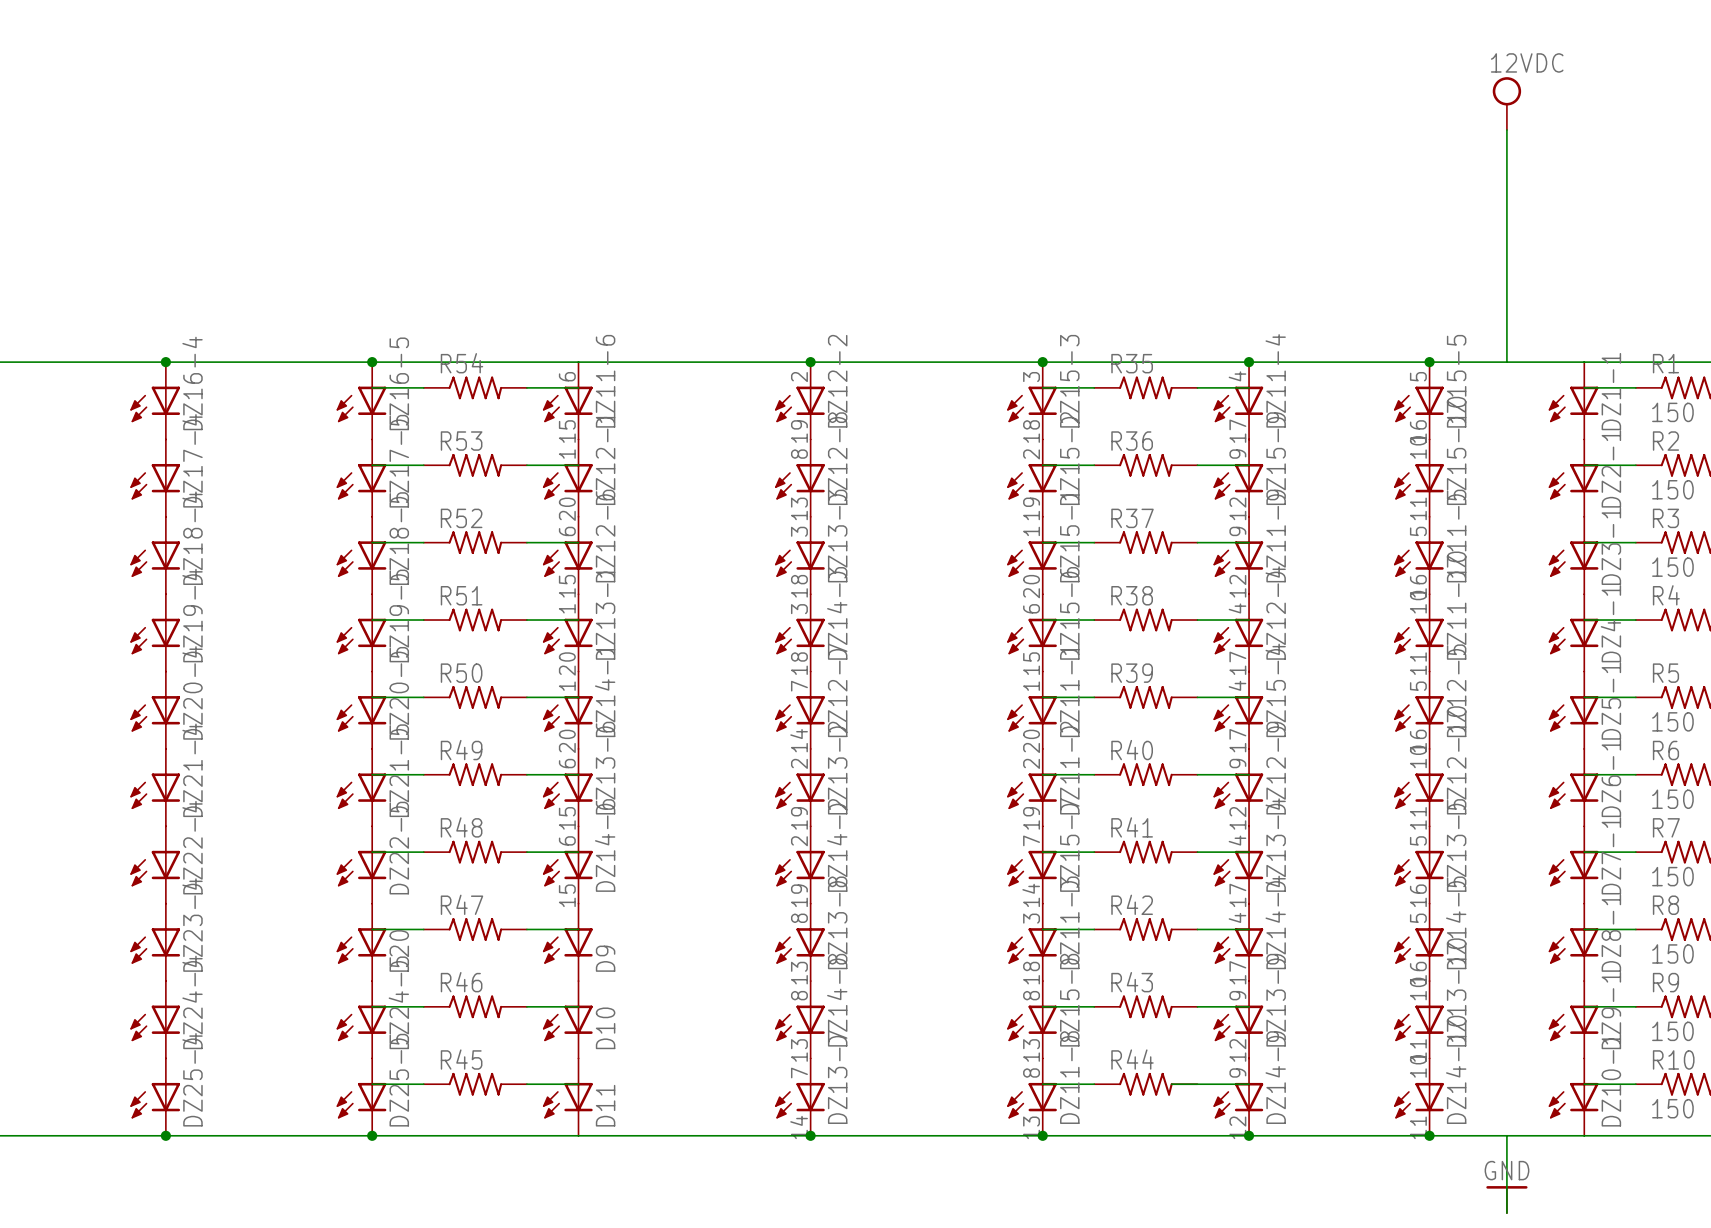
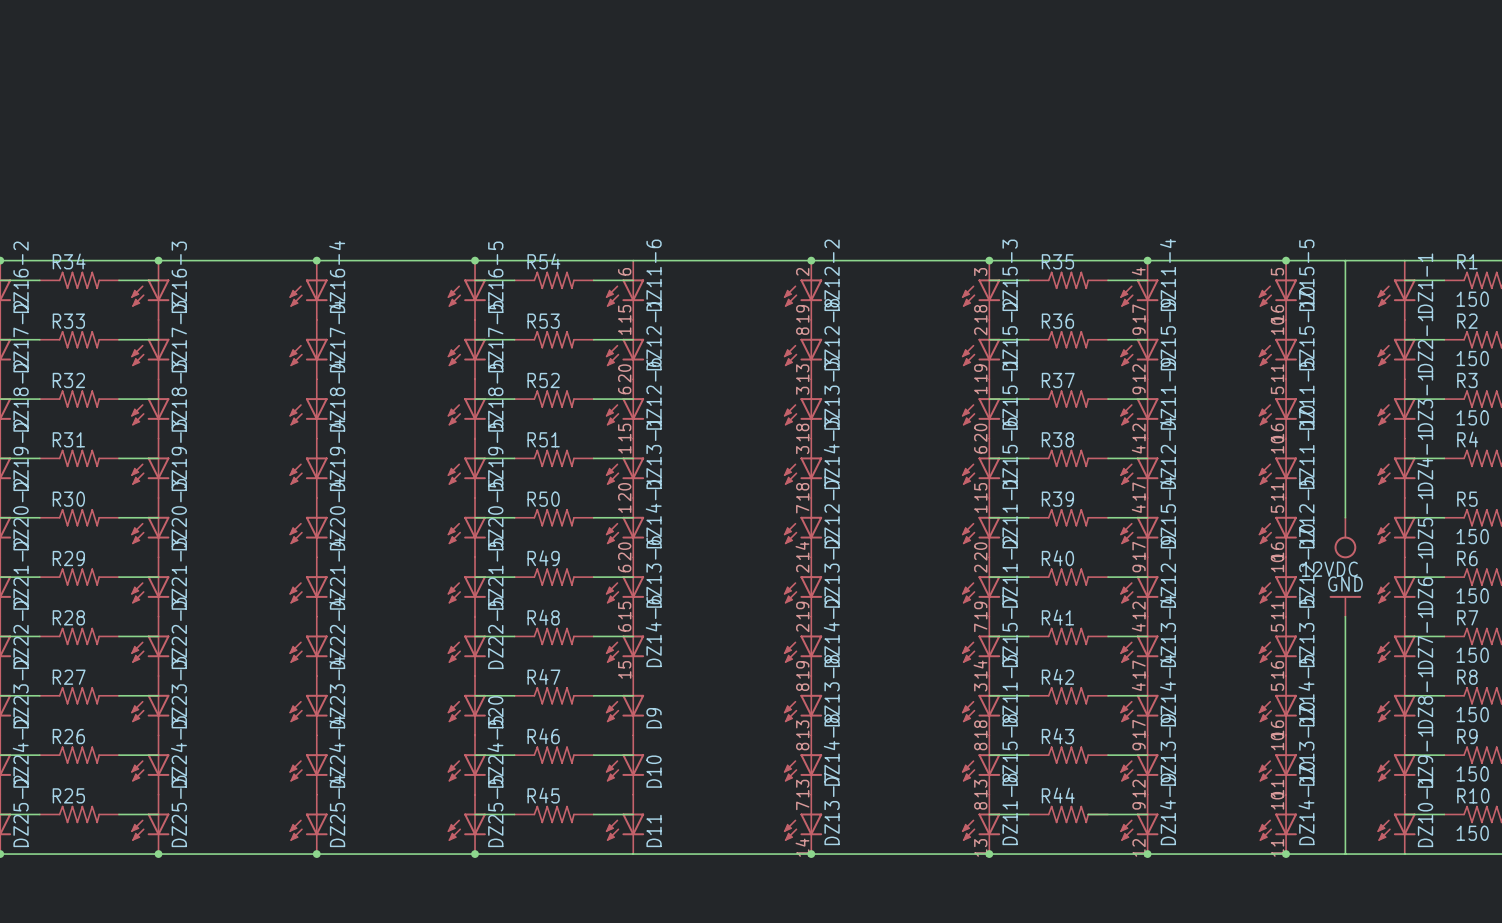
power symbol: 12VDC (1506, 103) -> none
wire: (1506, 130) (1506, 362) -> (1345, 517) (1345, 260)
power symbol: none -> 12VDC (1345, 538)
power symbol: none -> GND (1345, 606)
wire: (1506, 1135) (1506, 1213) -> (1345, 854) (1345, 616)
power symbol: GND (1506, 1199) -> none

